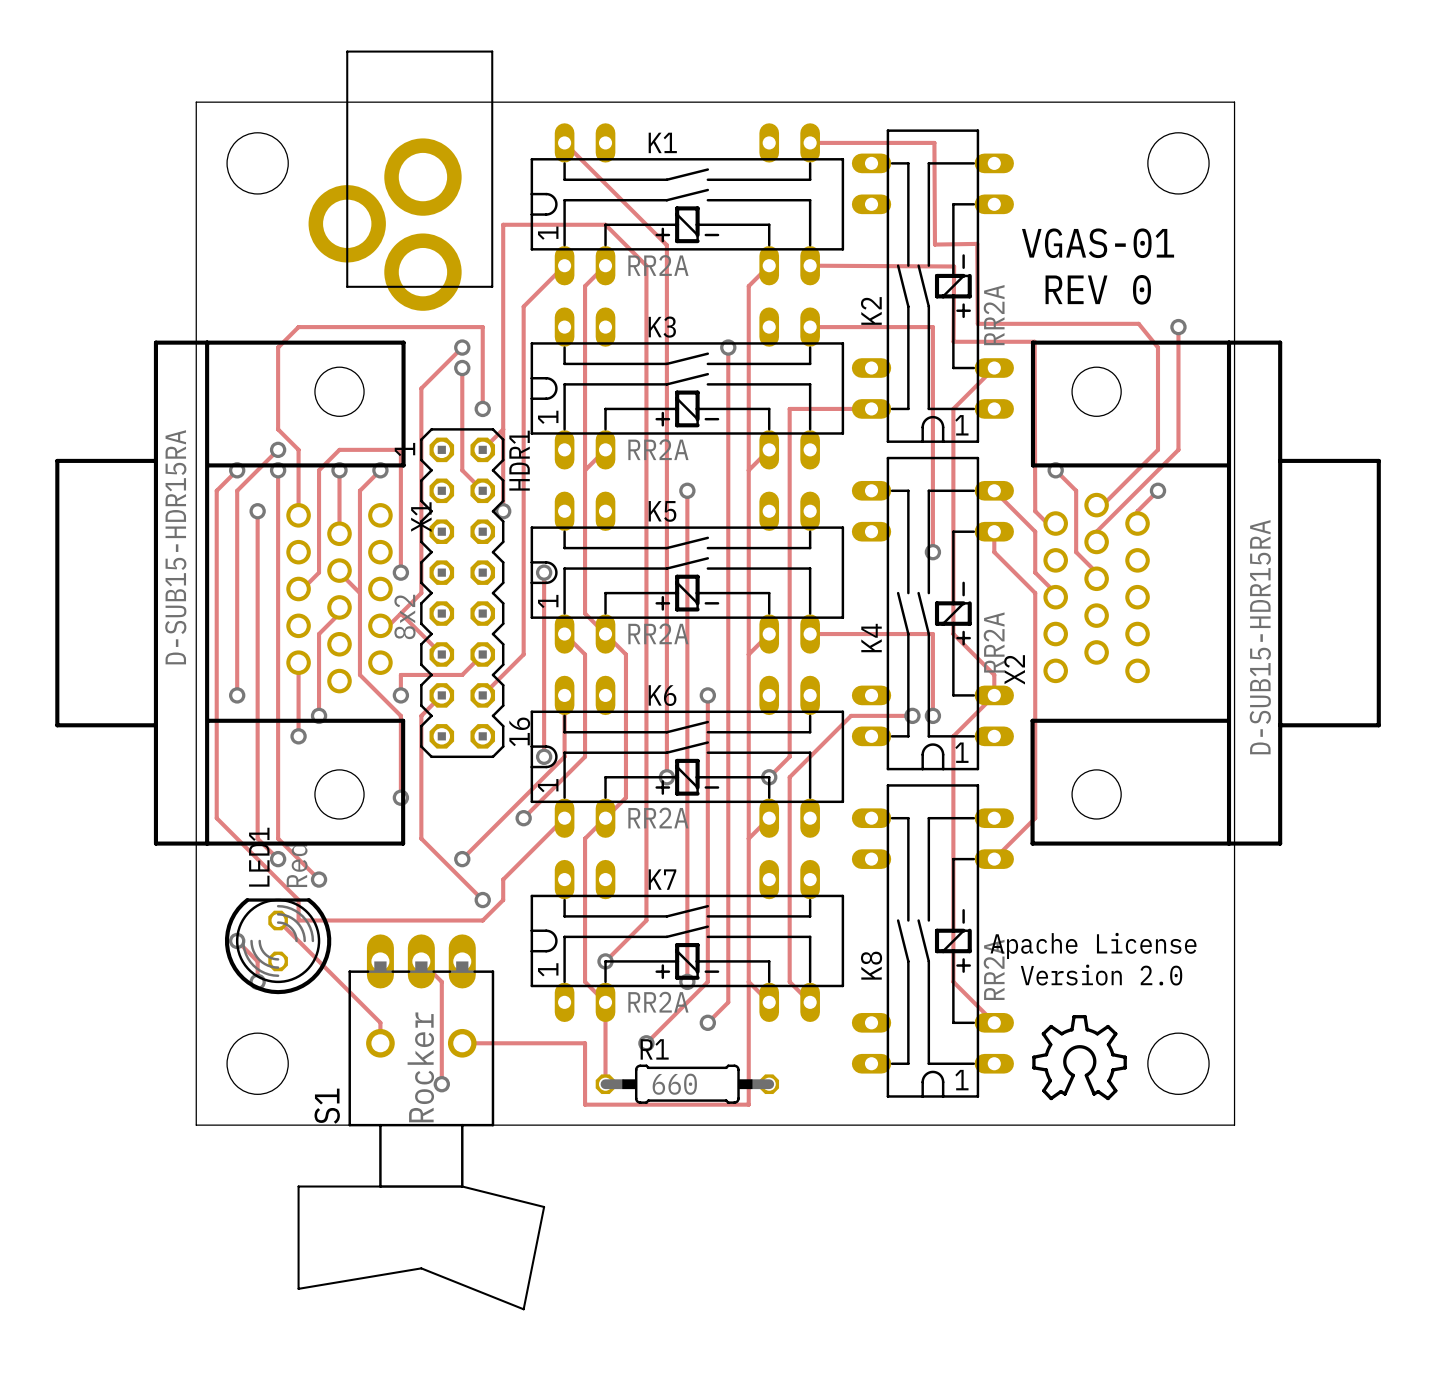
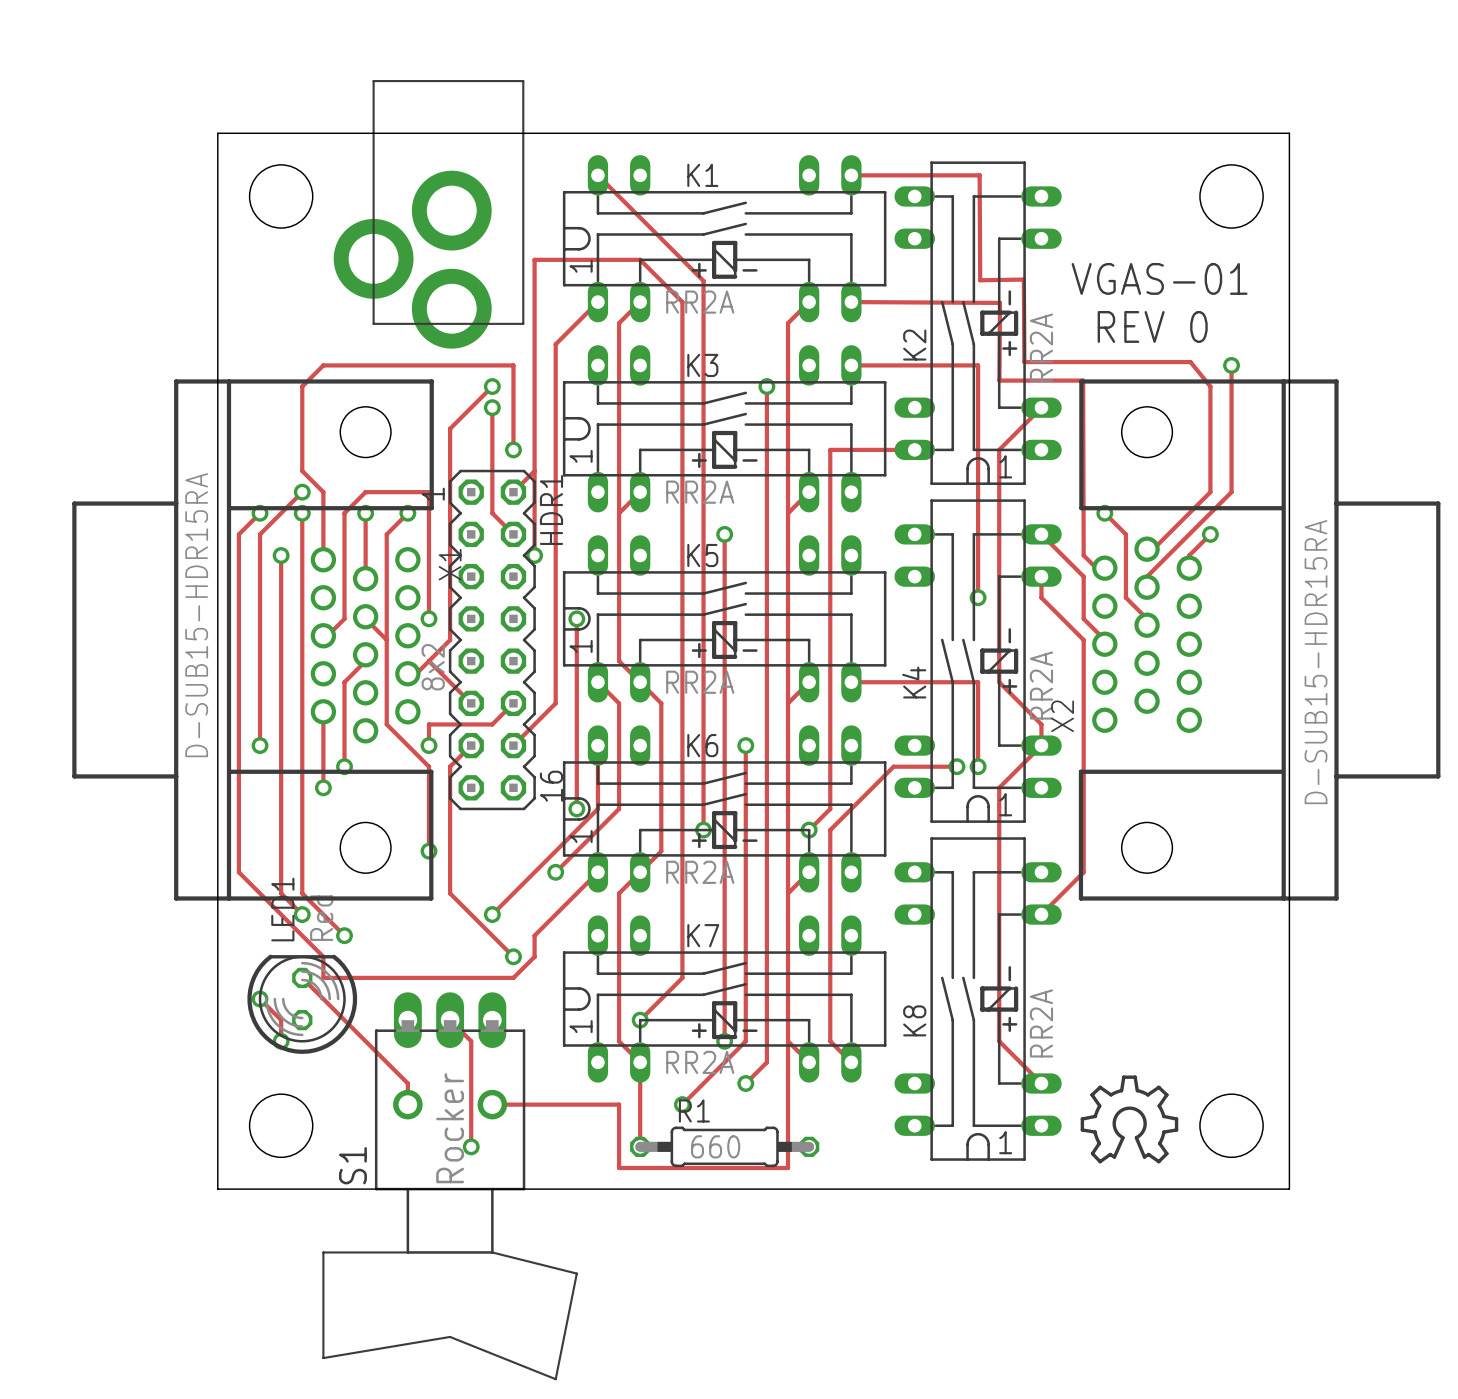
text: Apache License (1093, 945) -> none
text: Version 2.0 (1101, 975) -> none

